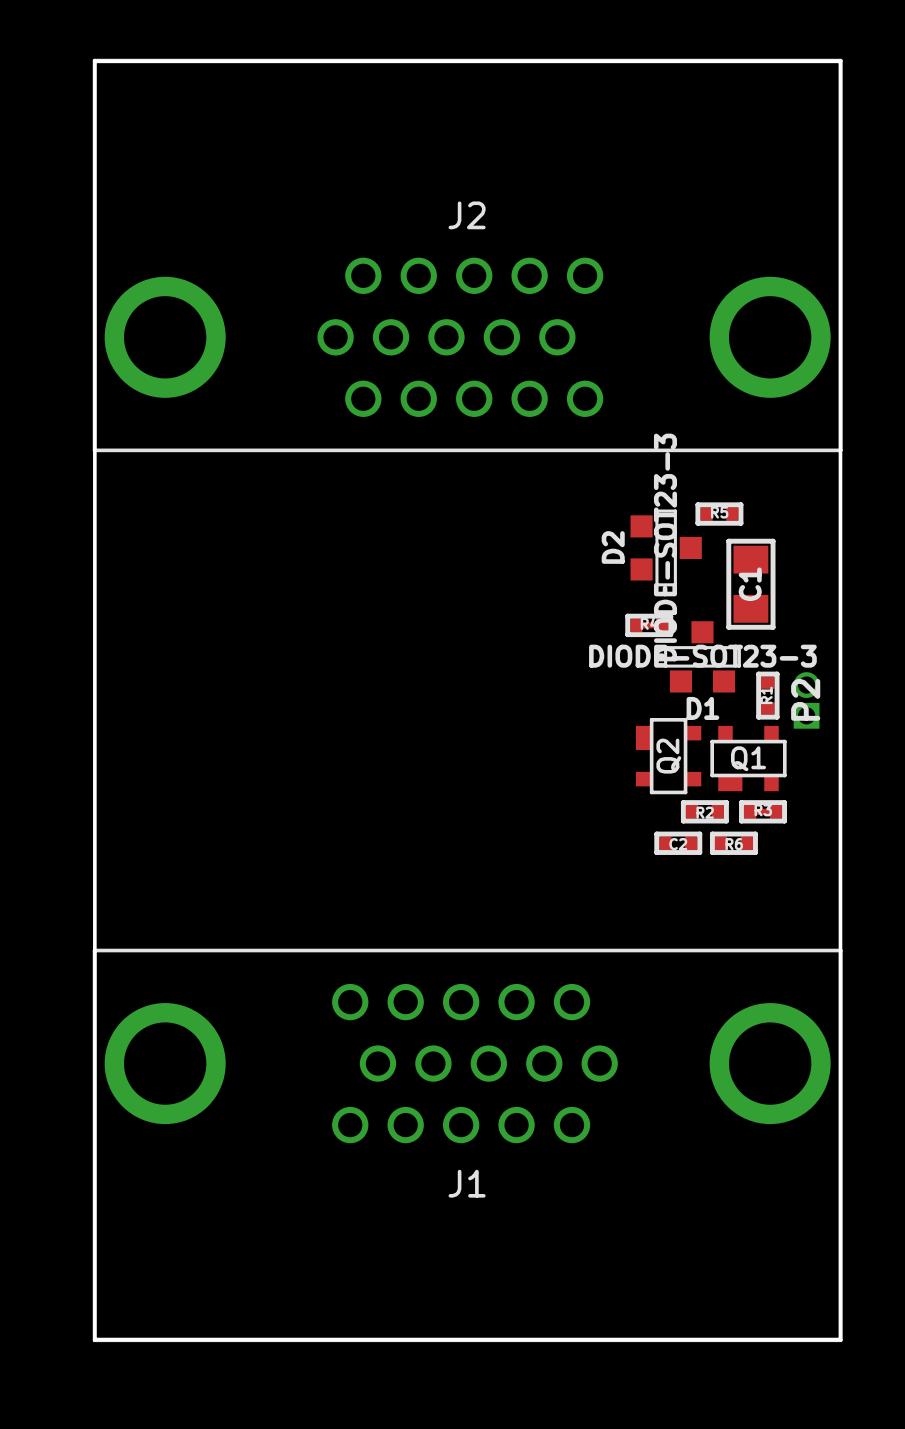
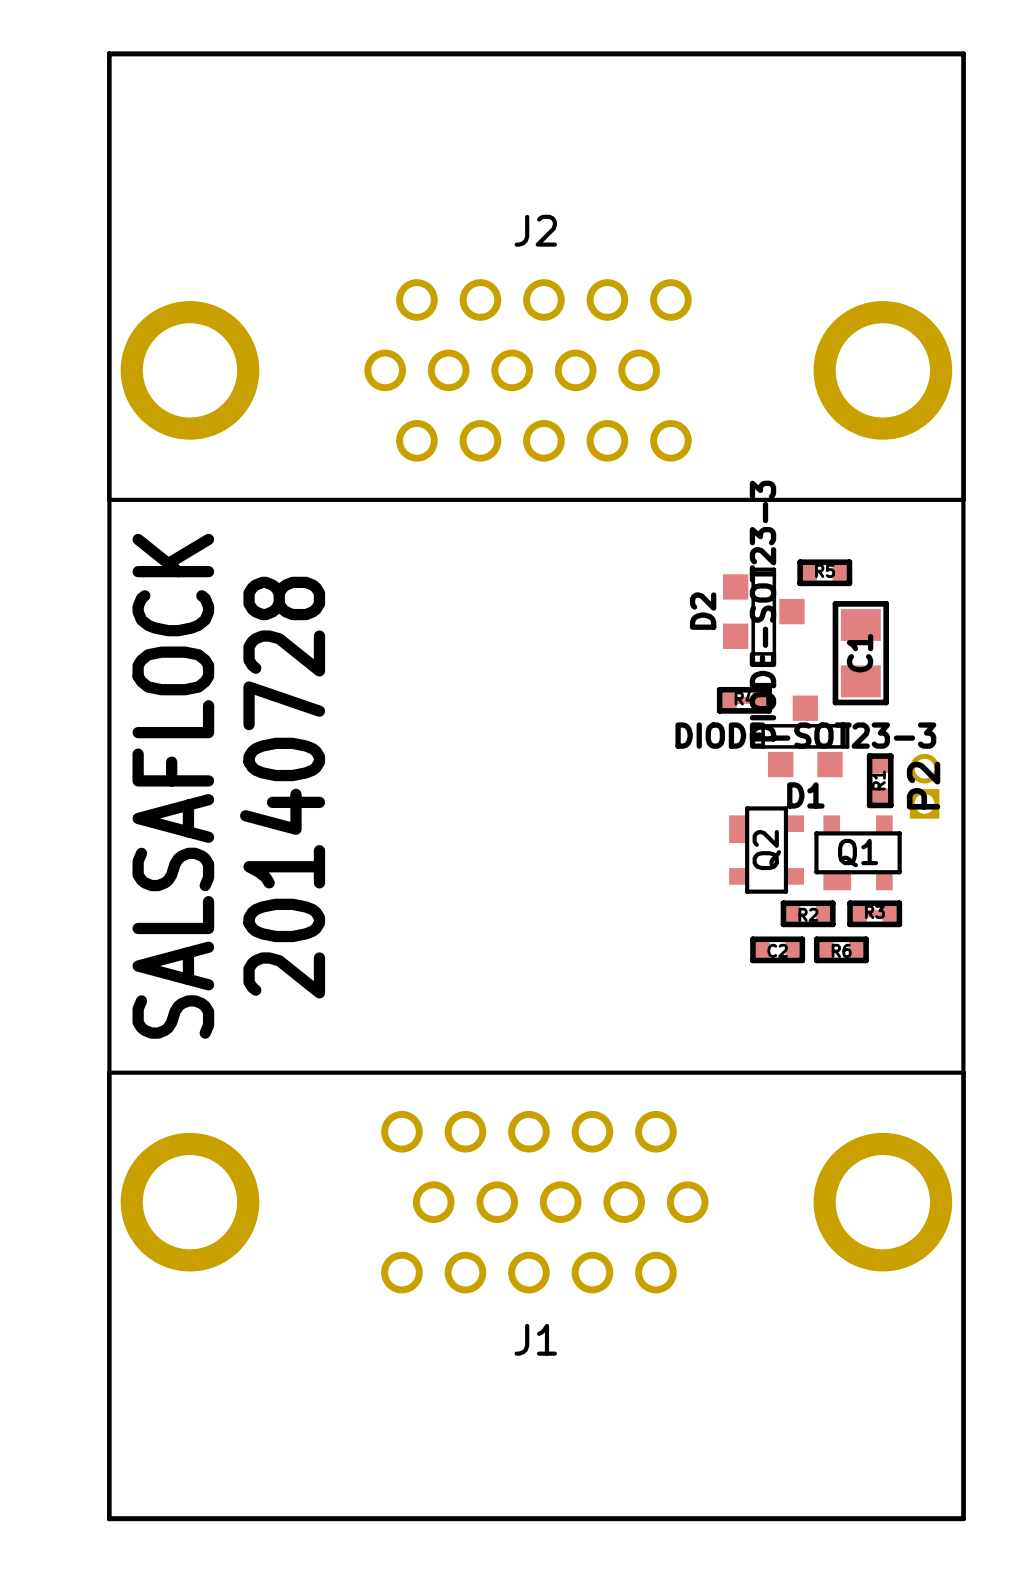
text: none -> SALSAFLOCK (173, 786)
text: none -> 20140728 (282, 787)

